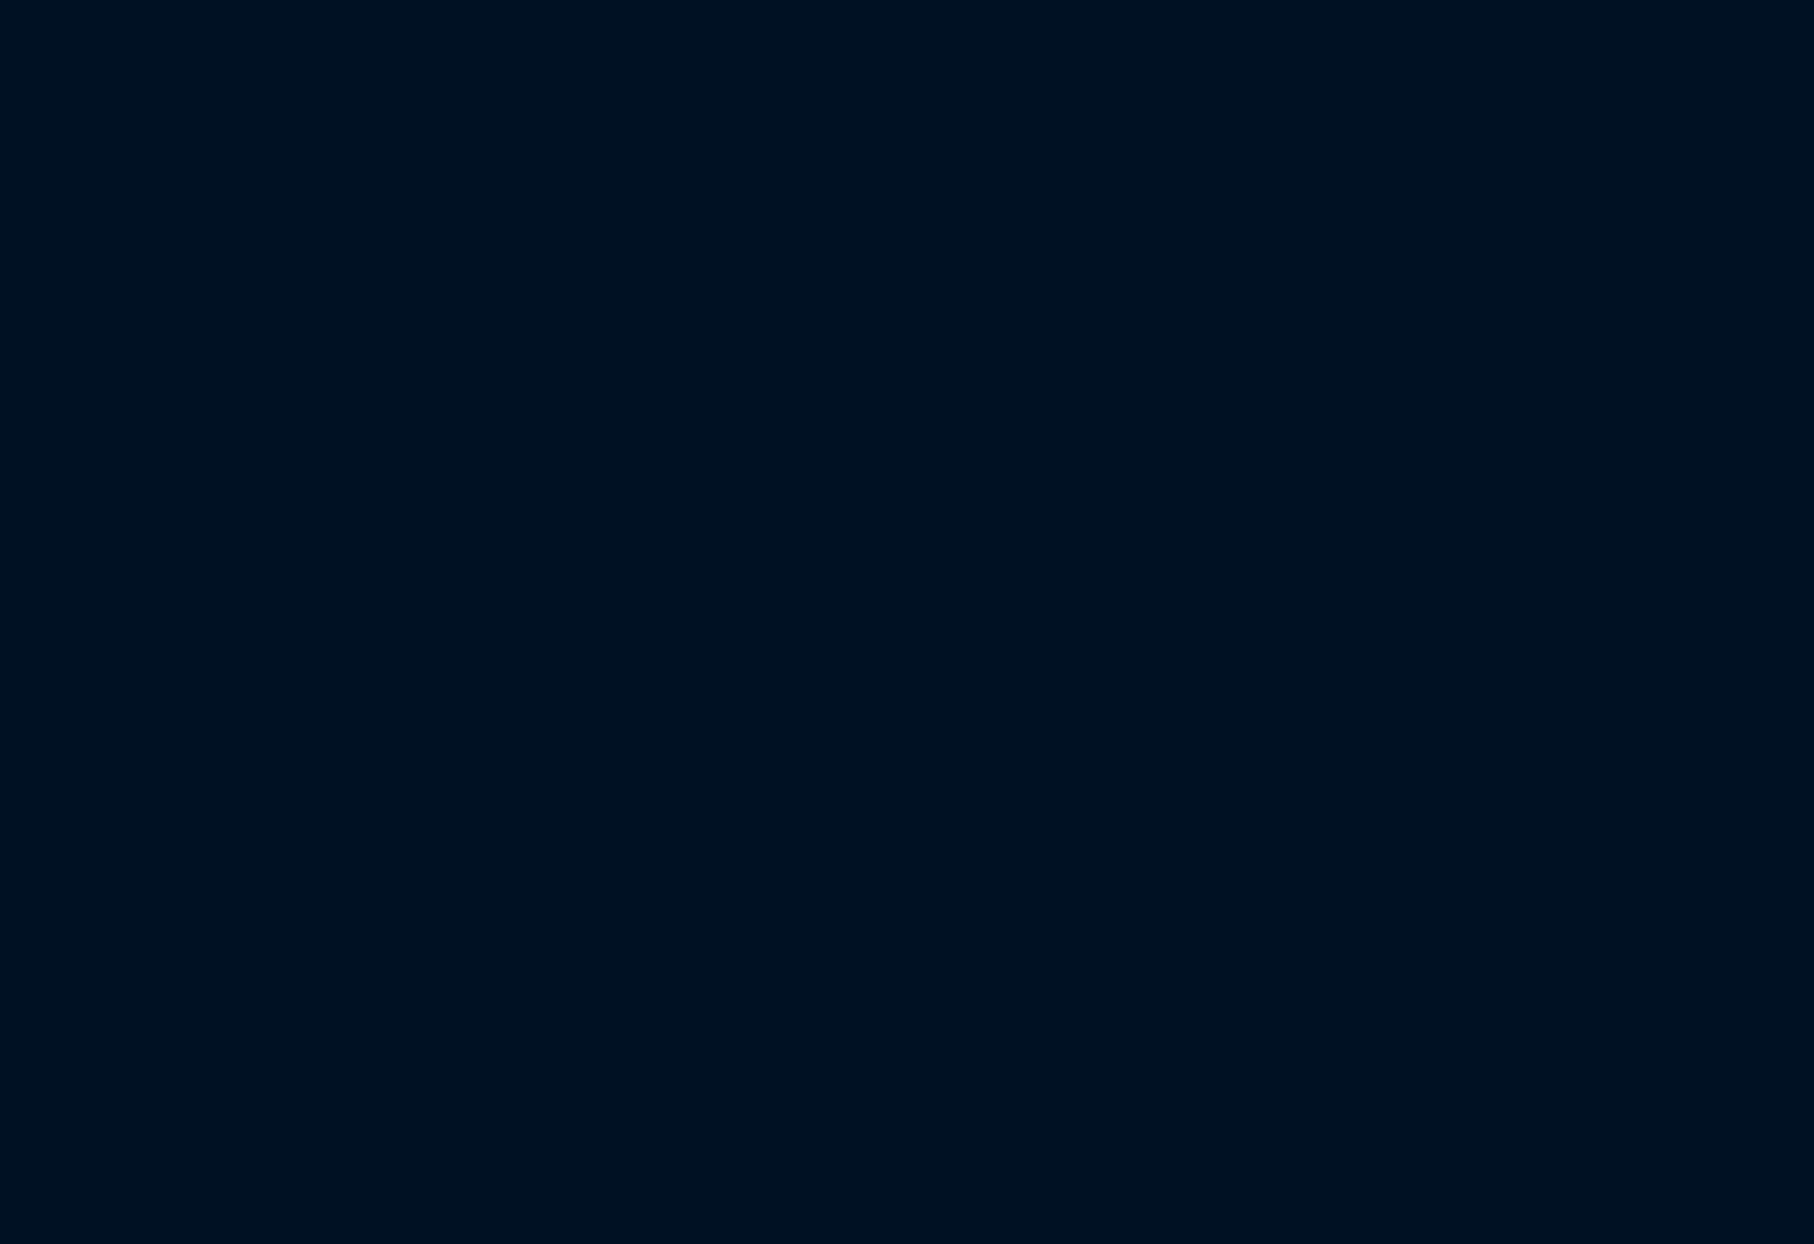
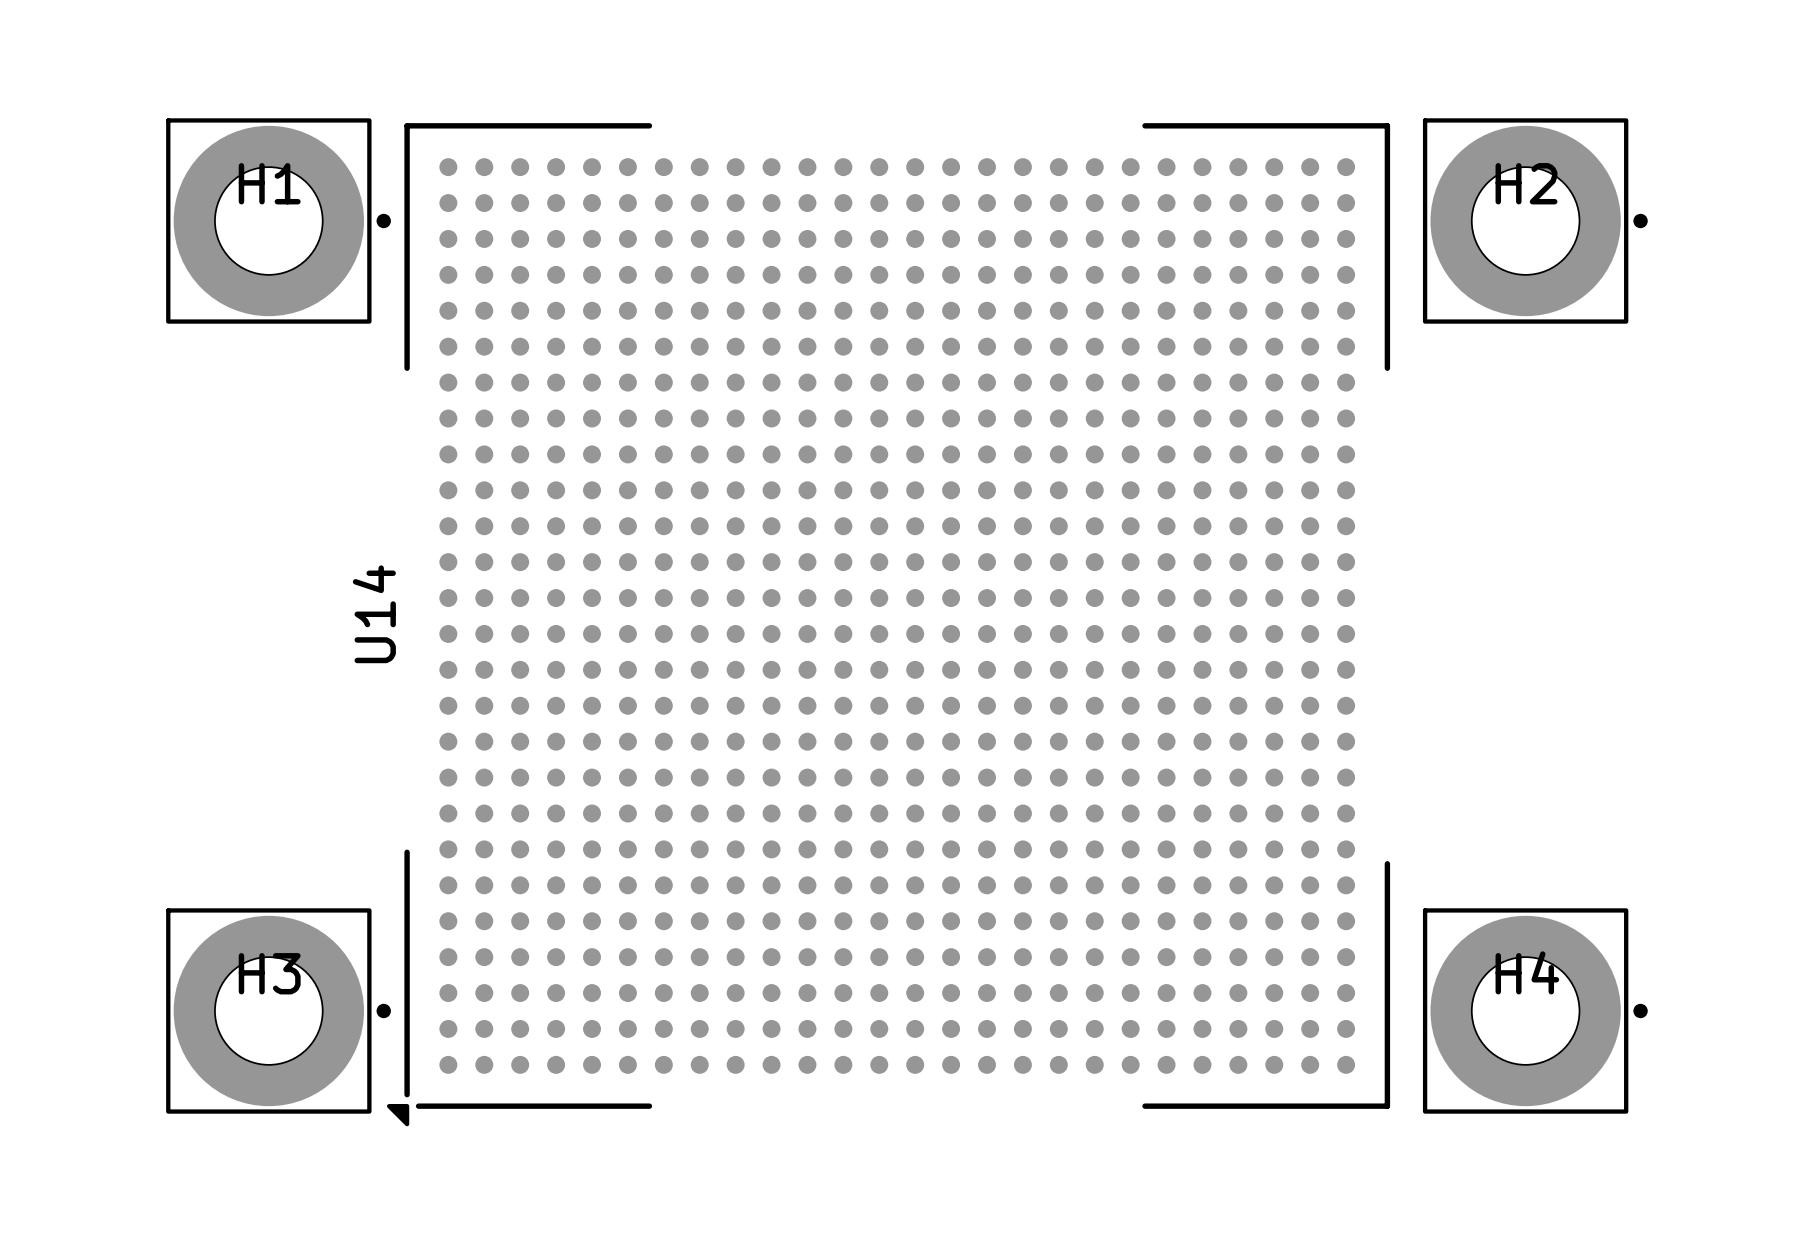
H1: none -> (278, 221)
H2: none -> (1535, 221)
U14: none -> (888, 624)
H3: none -> (278, 1010)
H4: none -> (1535, 1010)

